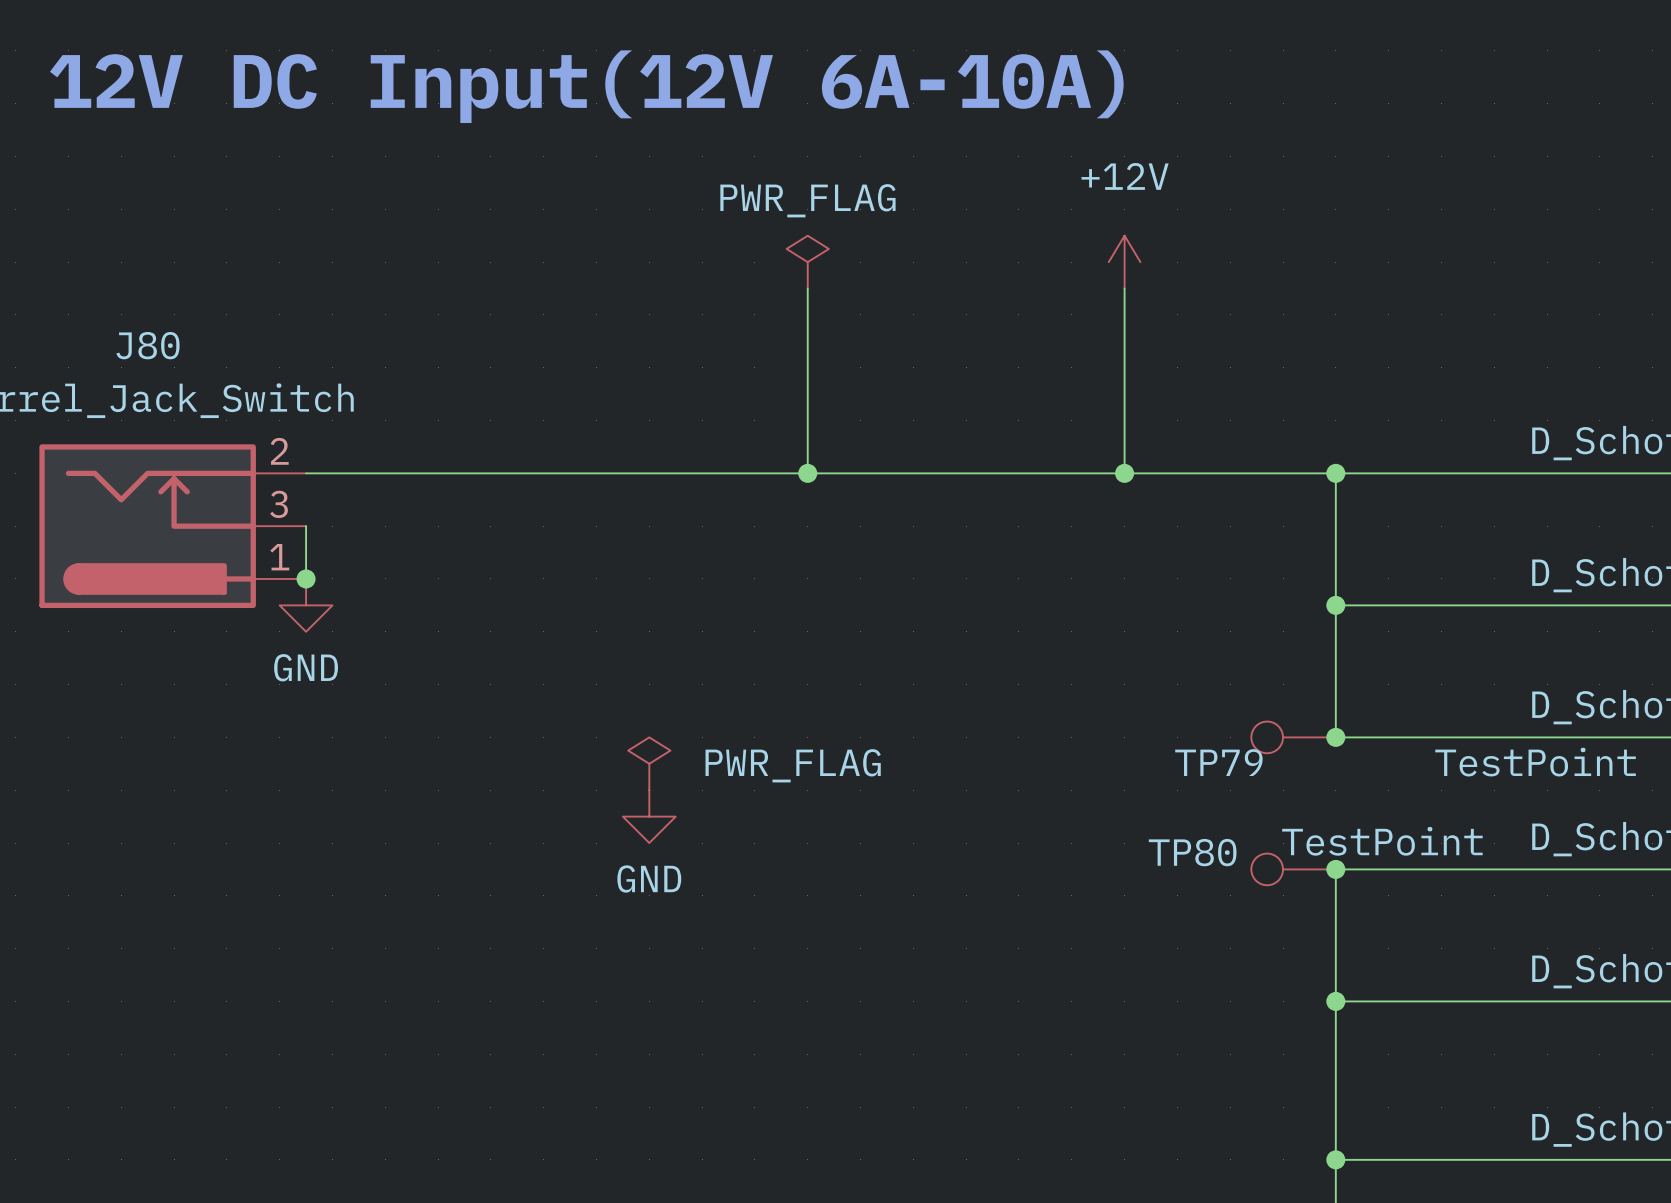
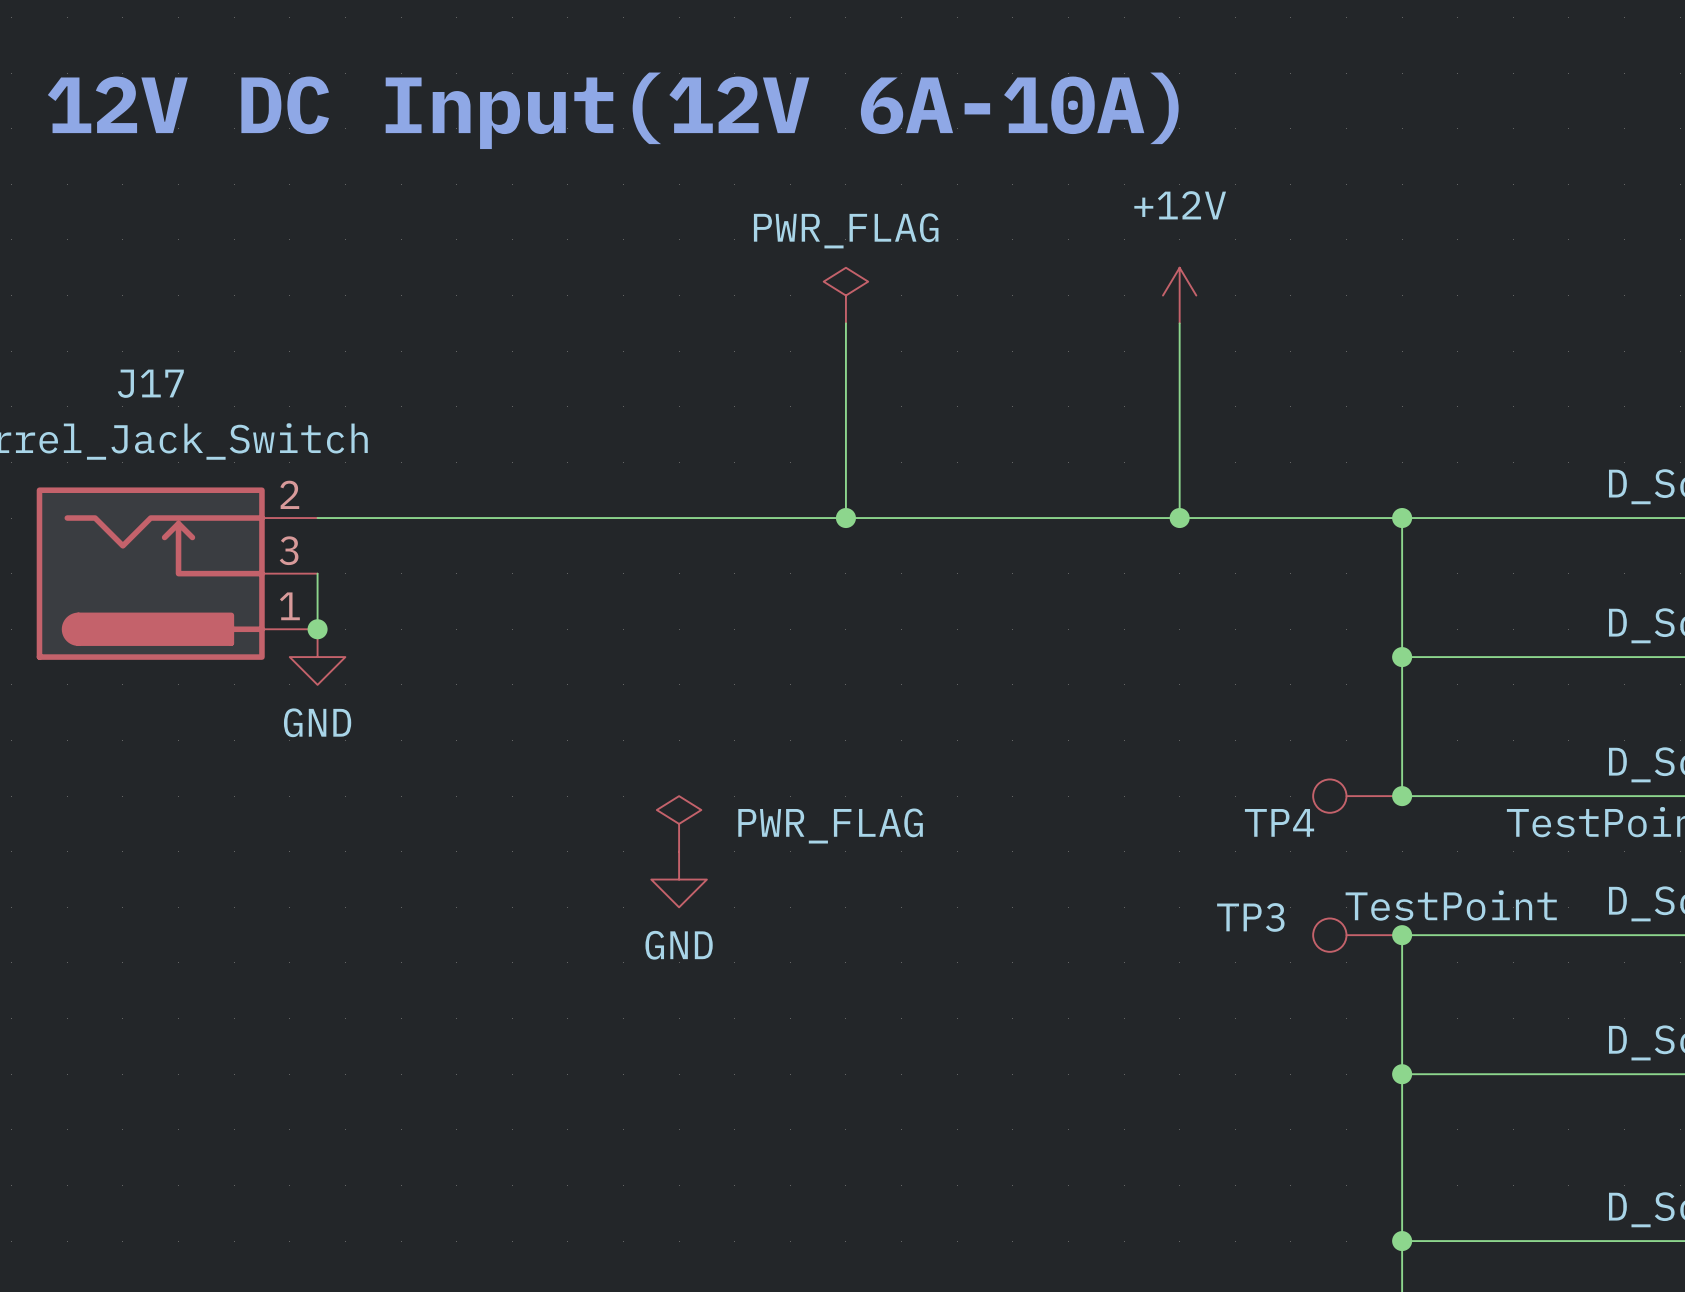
J80 name: J80 (147, 345) -> J17 (150, 383)
TP79 name: TP79 (1218, 762) -> TP4 (1279, 822)
TP80 name: TP80 (1192, 852) -> TP3 (1250, 917)

